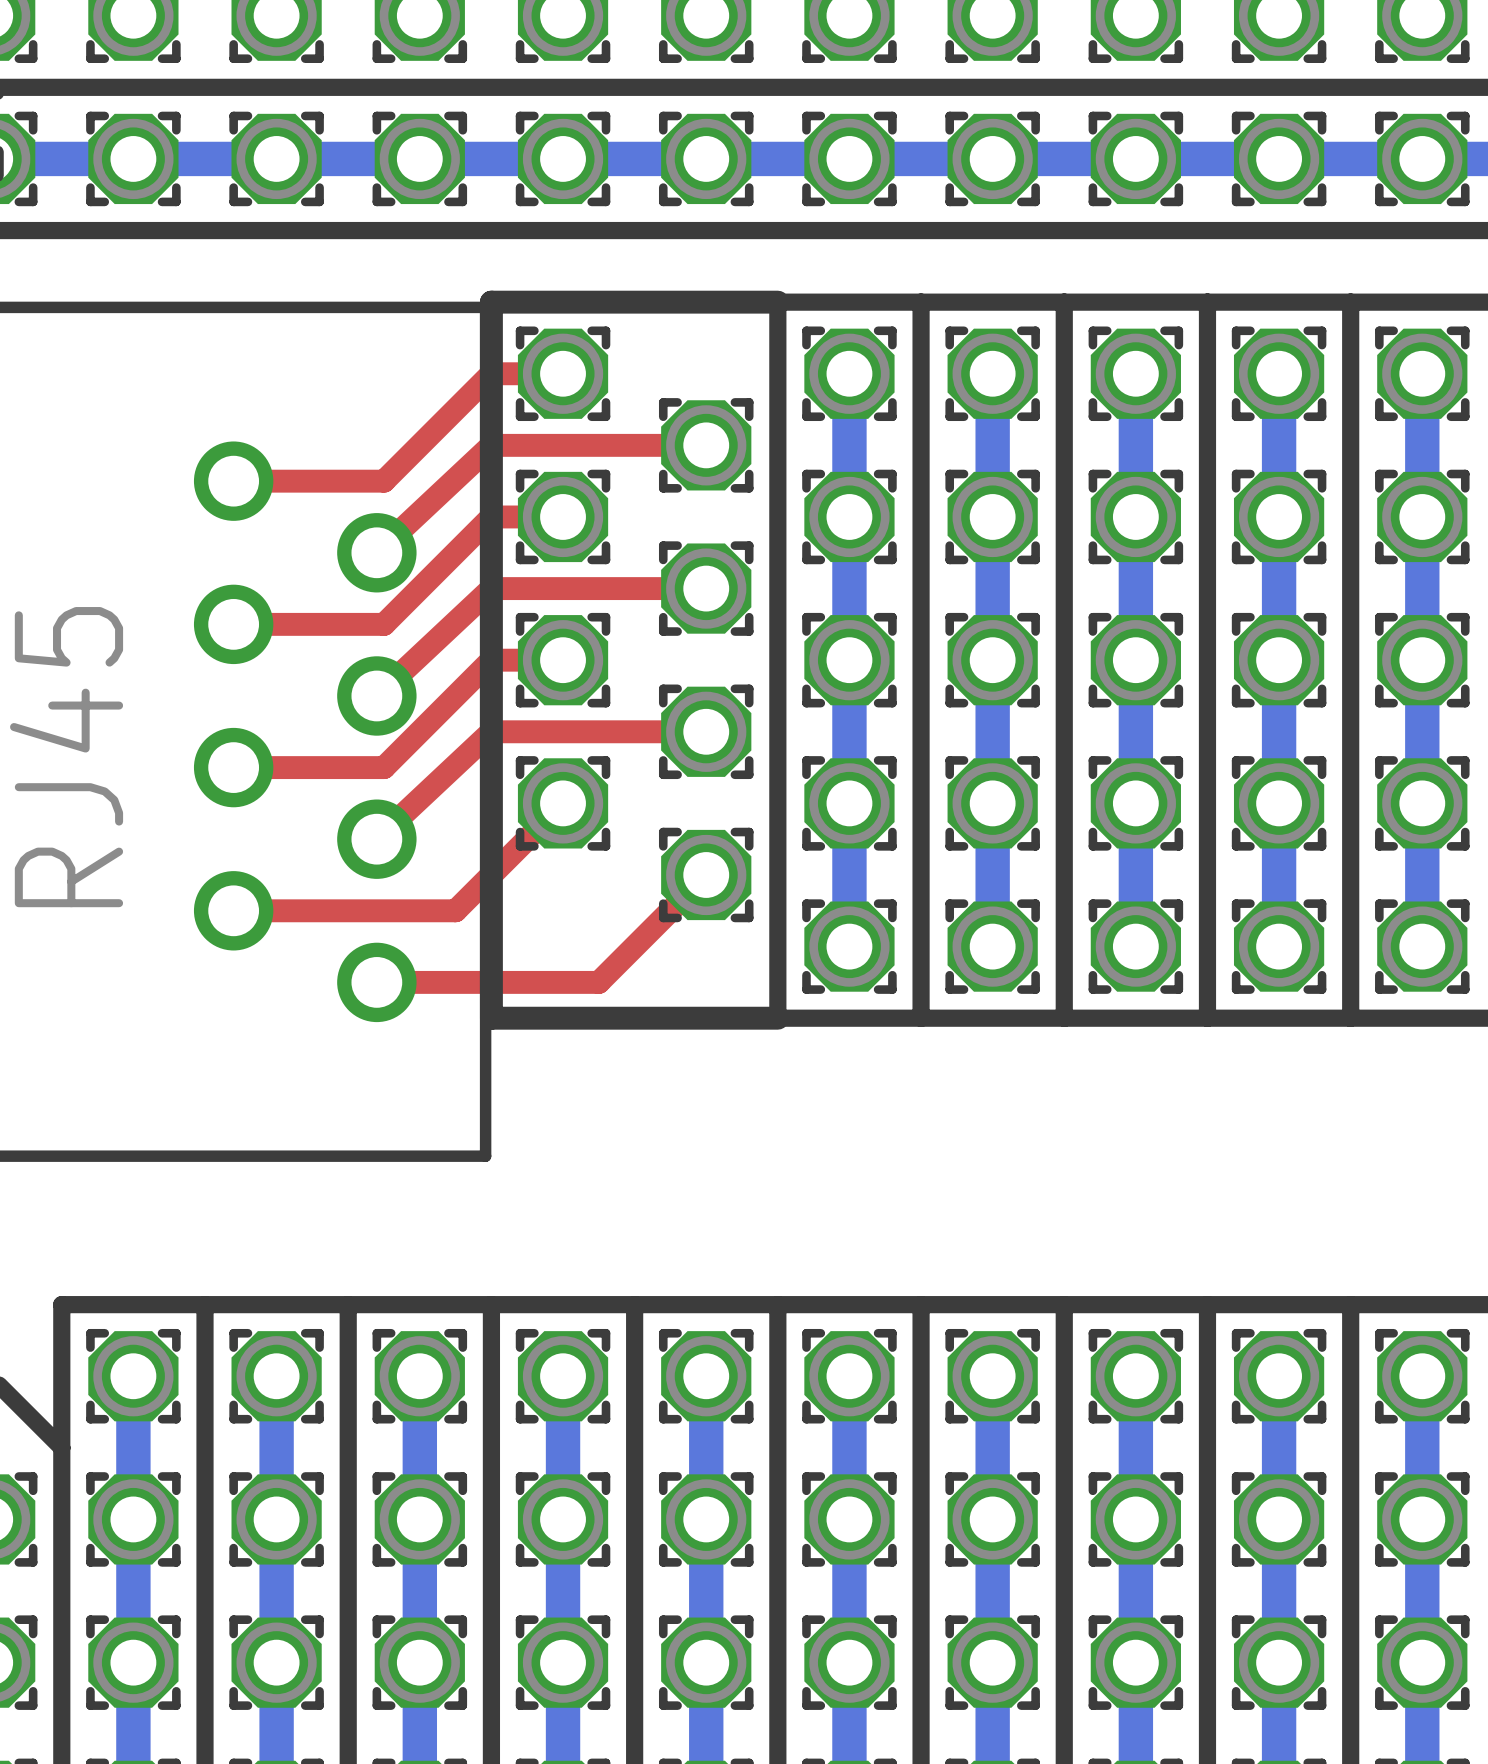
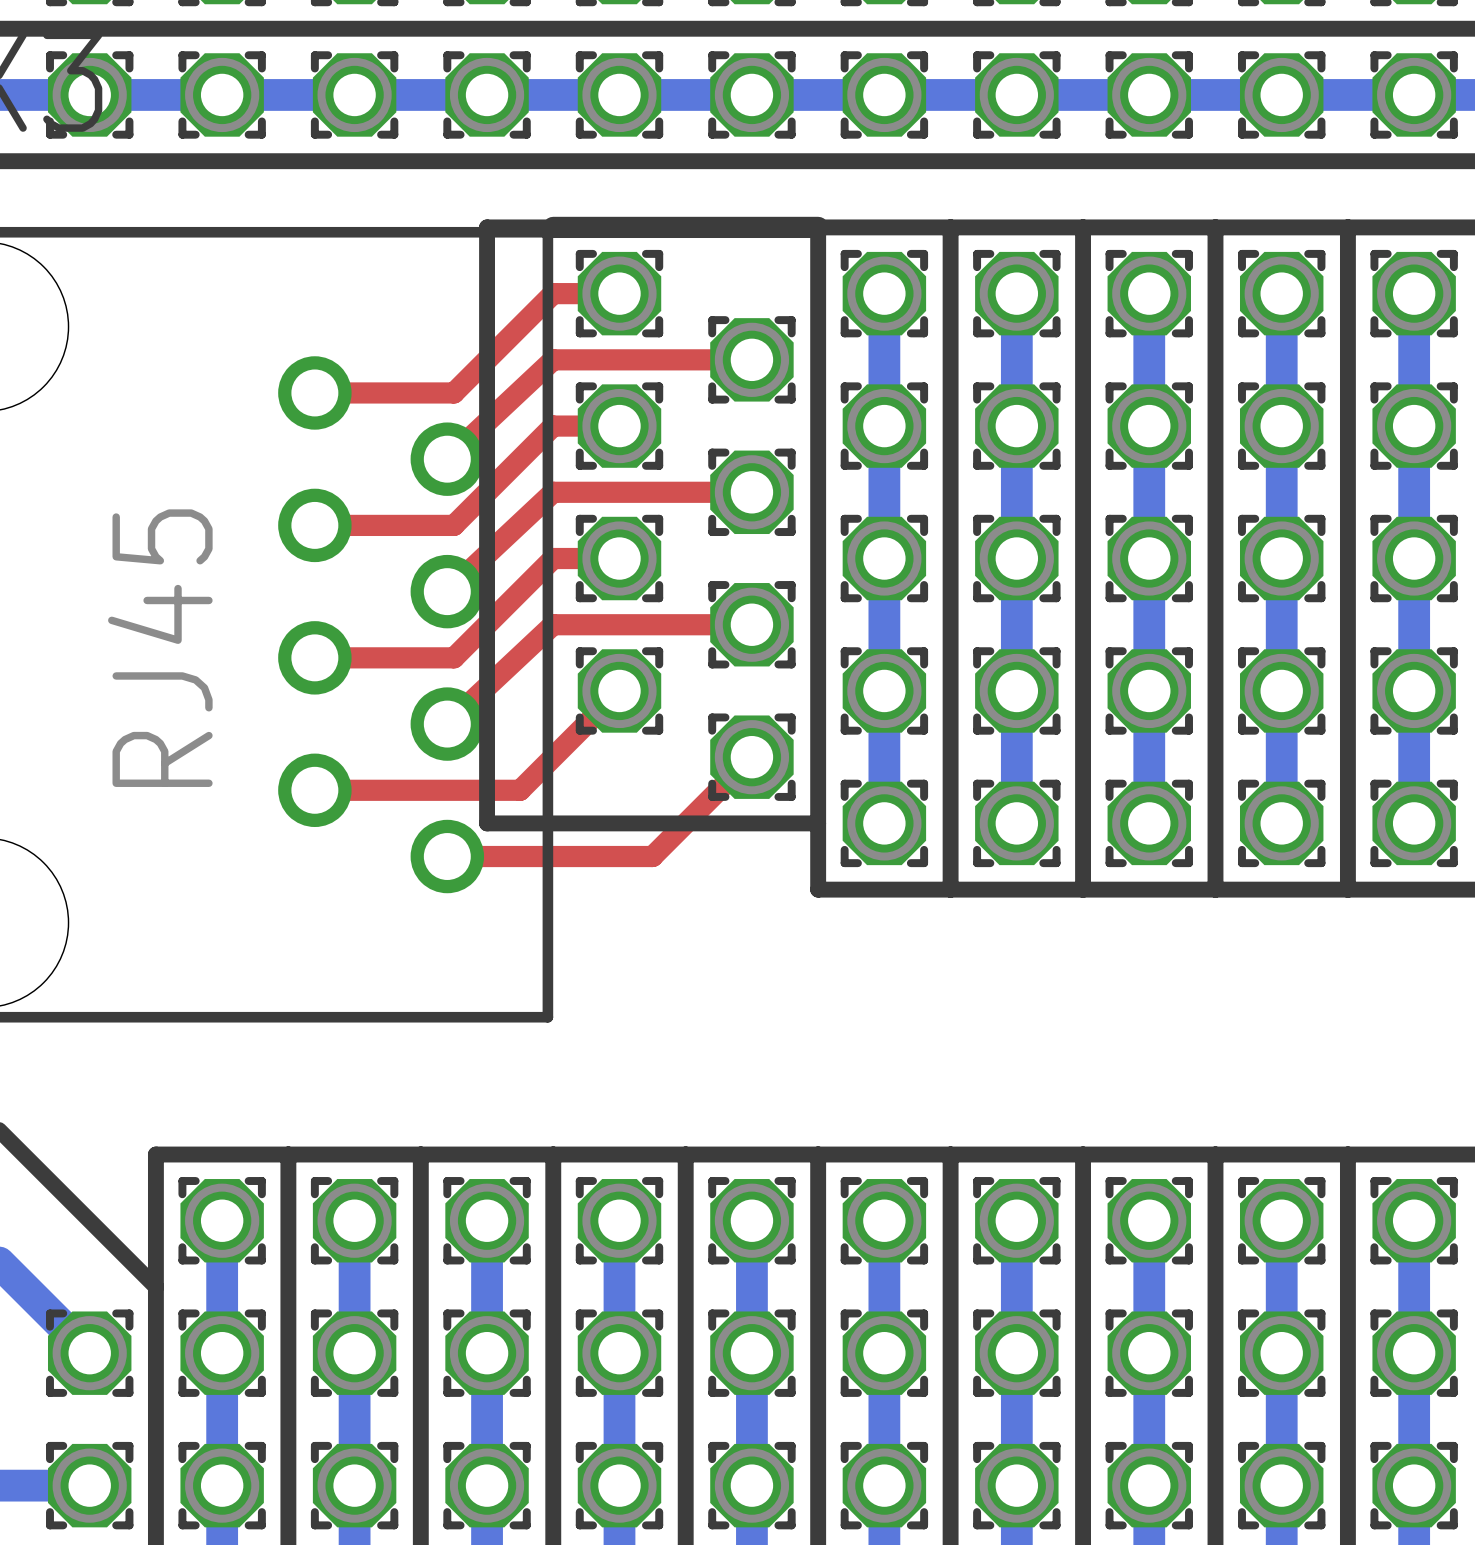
line: (491, 302) (491, 1018) (777, 1018) -> (553, 227) (487, 227) (487, 823) (818, 823)

